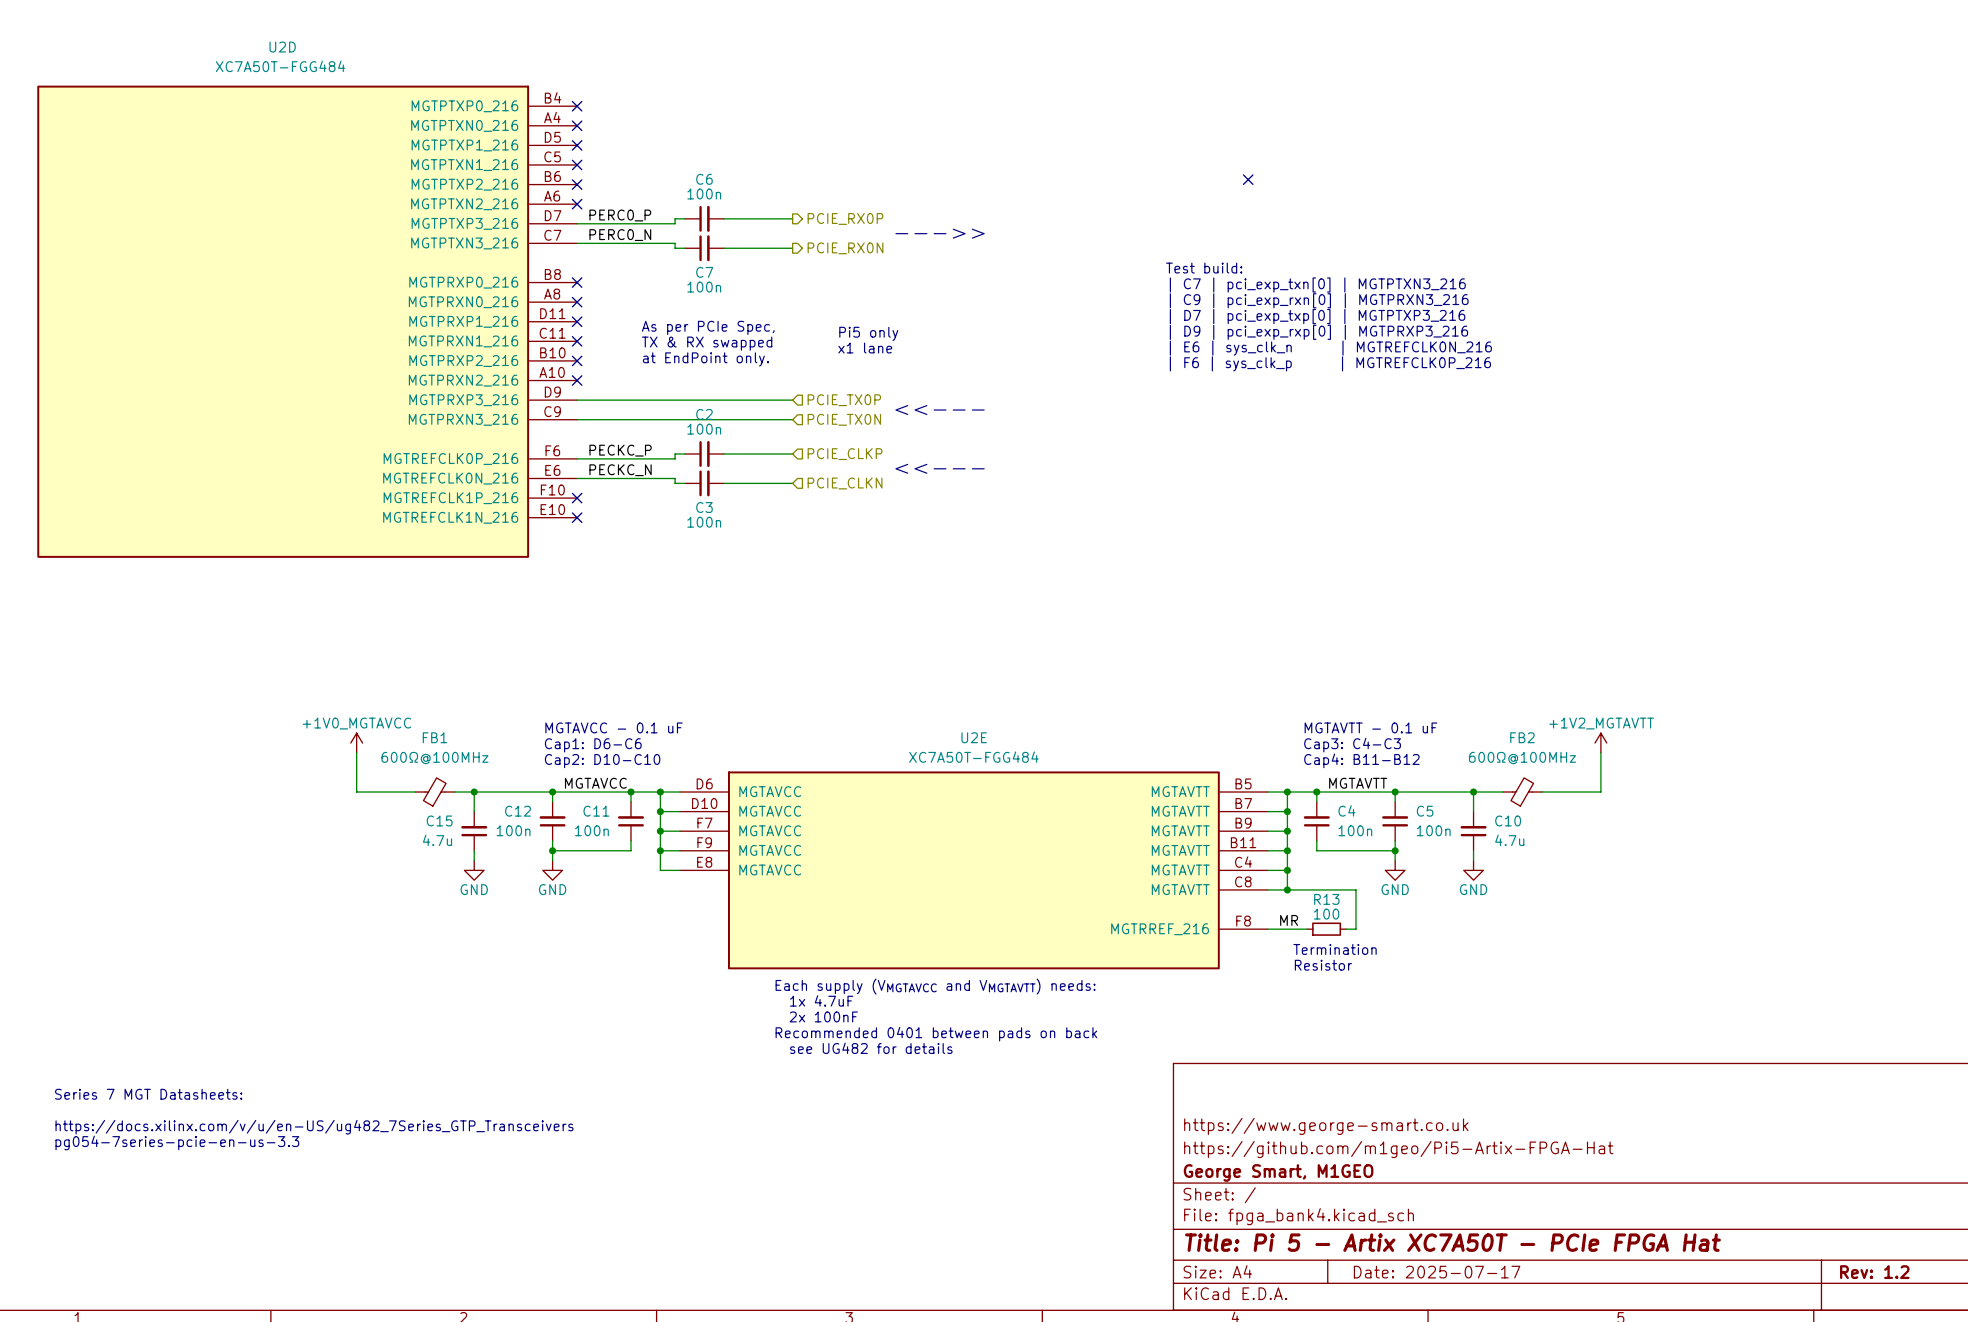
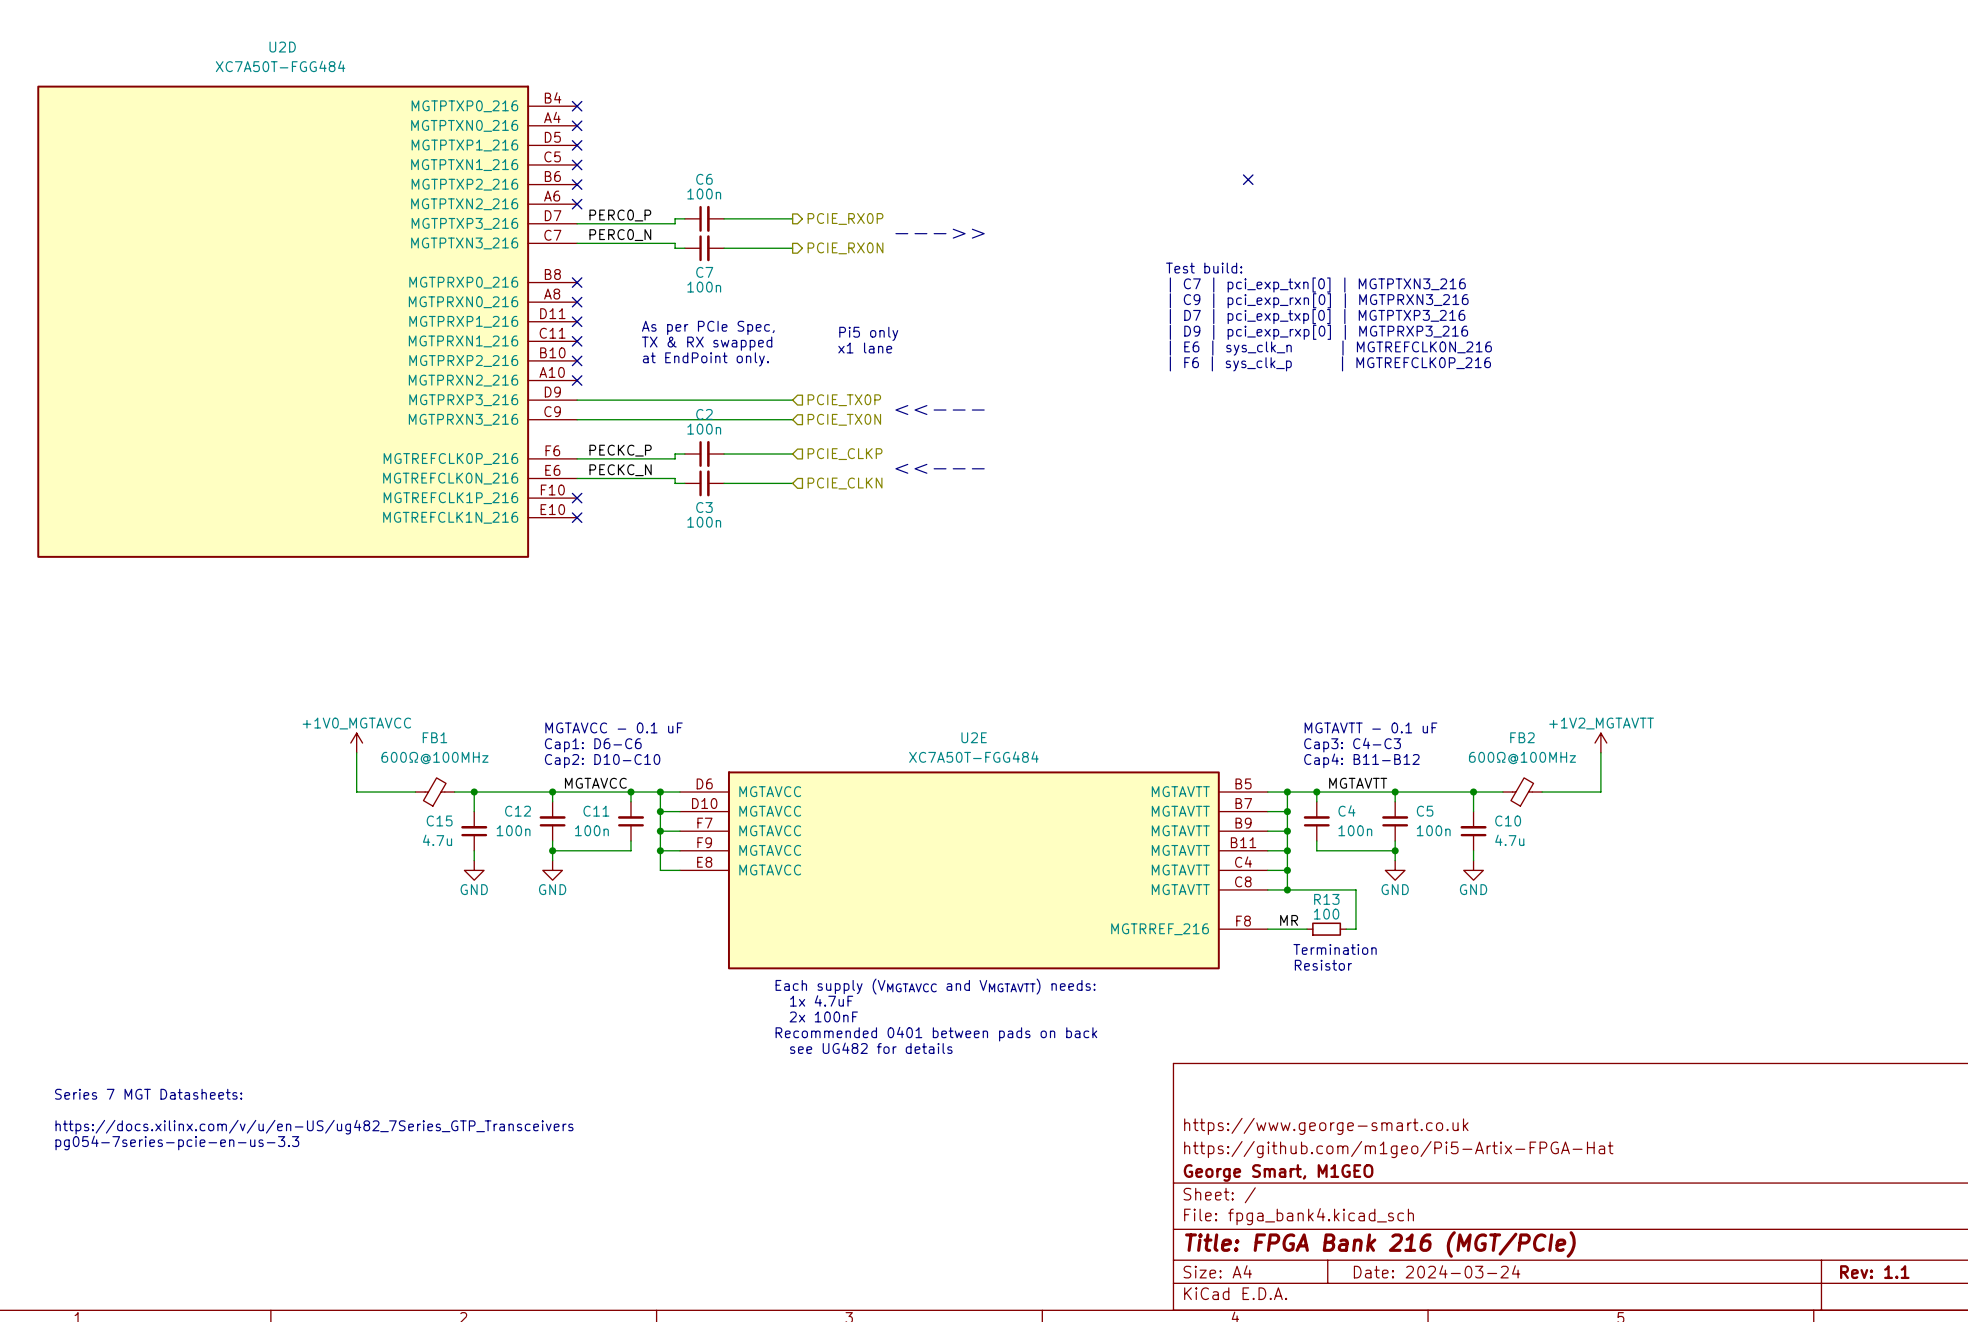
title block: Title: Pi 5 - Artix XC7A50T - PCIe FPGA Hat (1452, 1242) -> Title: FPGA Bank 216 (MGT/PCIe) (1380, 1244)
title block: Date: 2025-07-17 (1437, 1272) -> Date: 2024-03-24 (1437, 1271)
title block: Rev: 1.2 (1874, 1272) -> Rev: 1.1 (1874, 1272)

